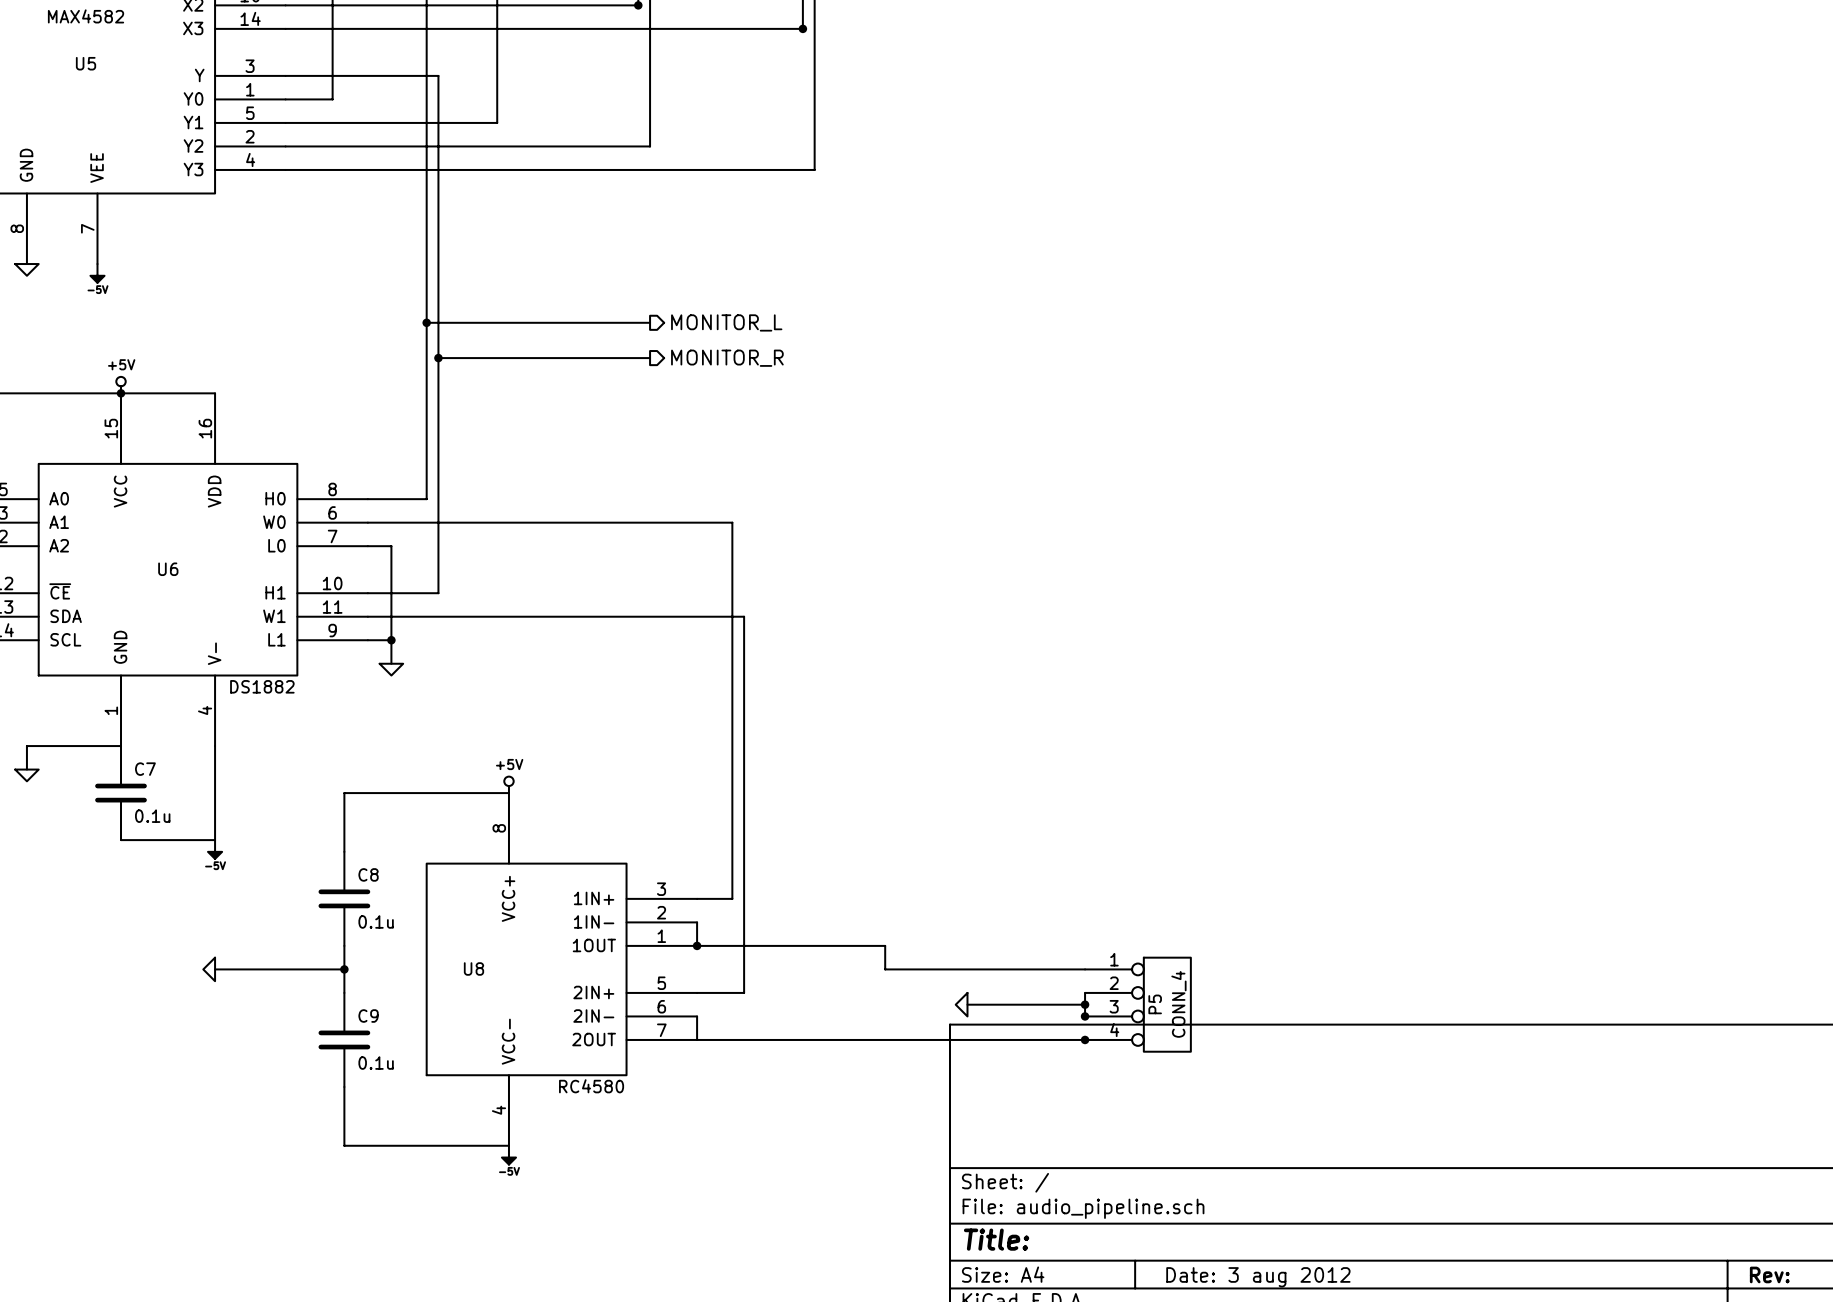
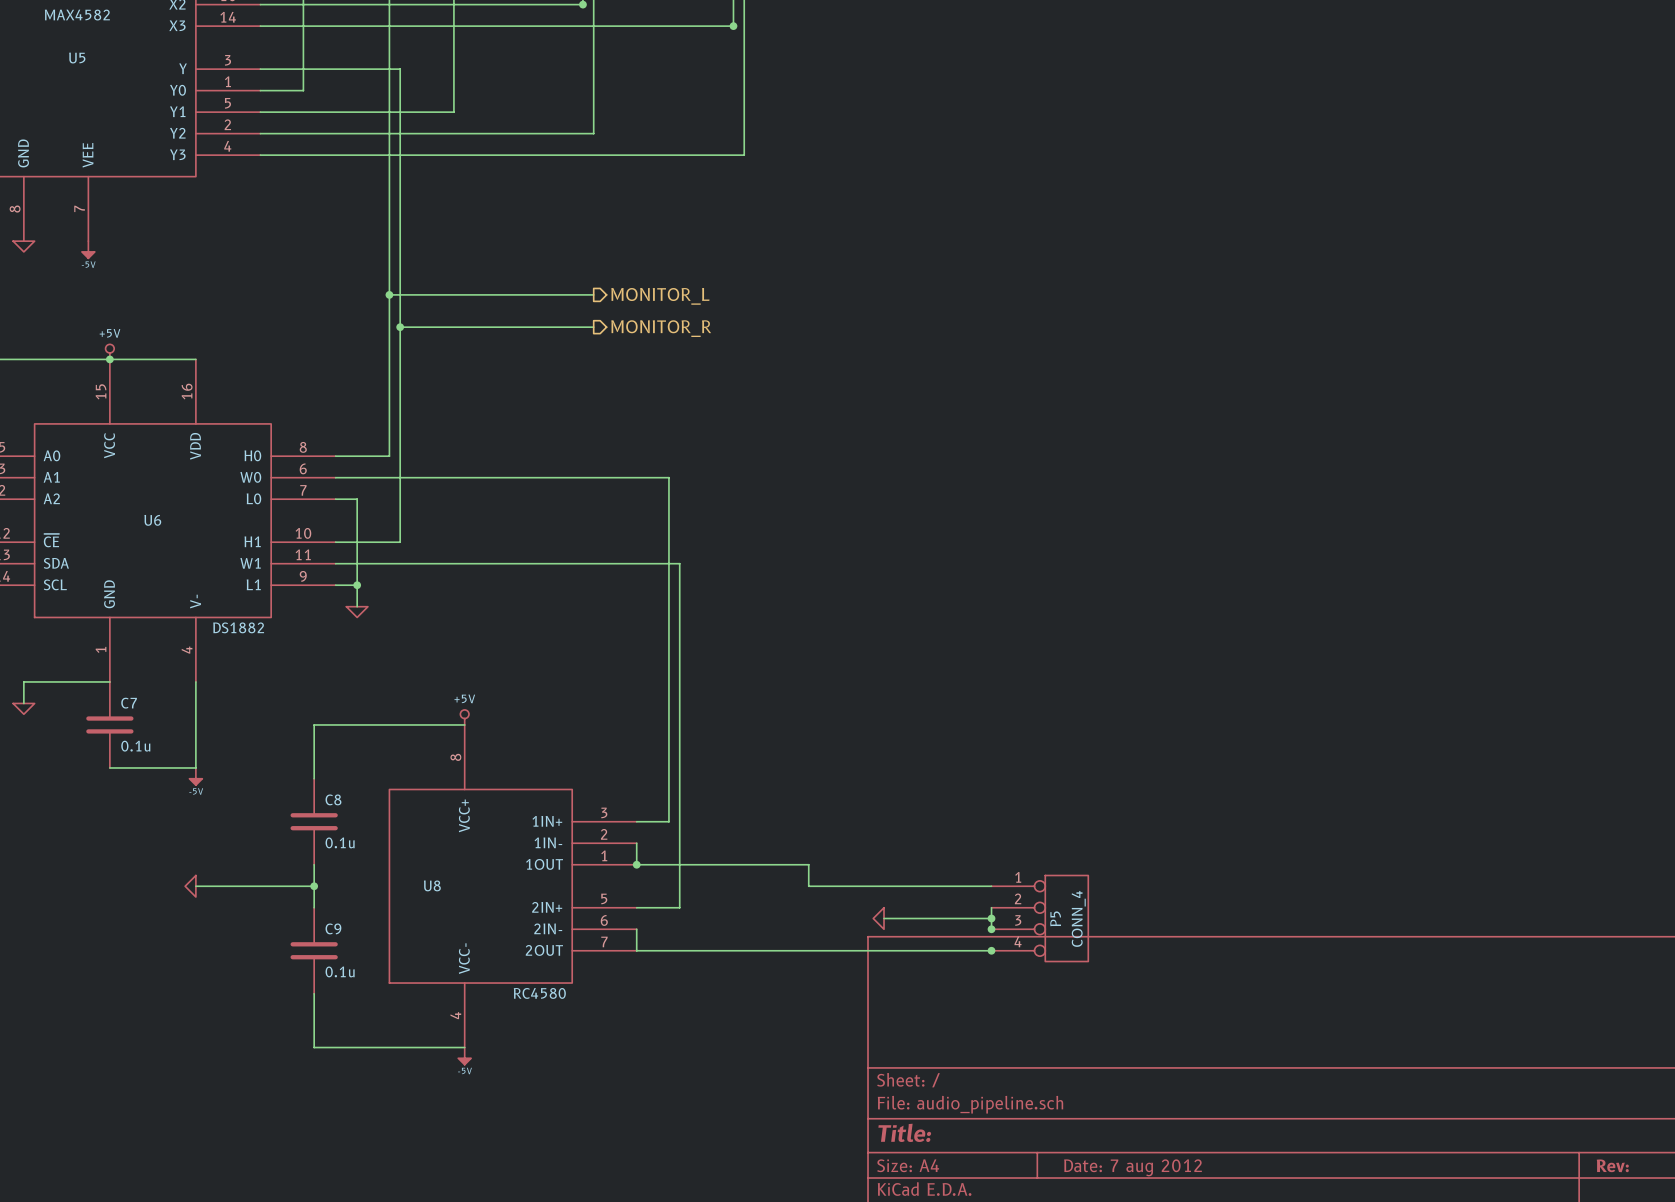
title block: Date: 3 aug 2012 (1258, 1277) -> Date: 7 aug 2012 (1133, 1167)

